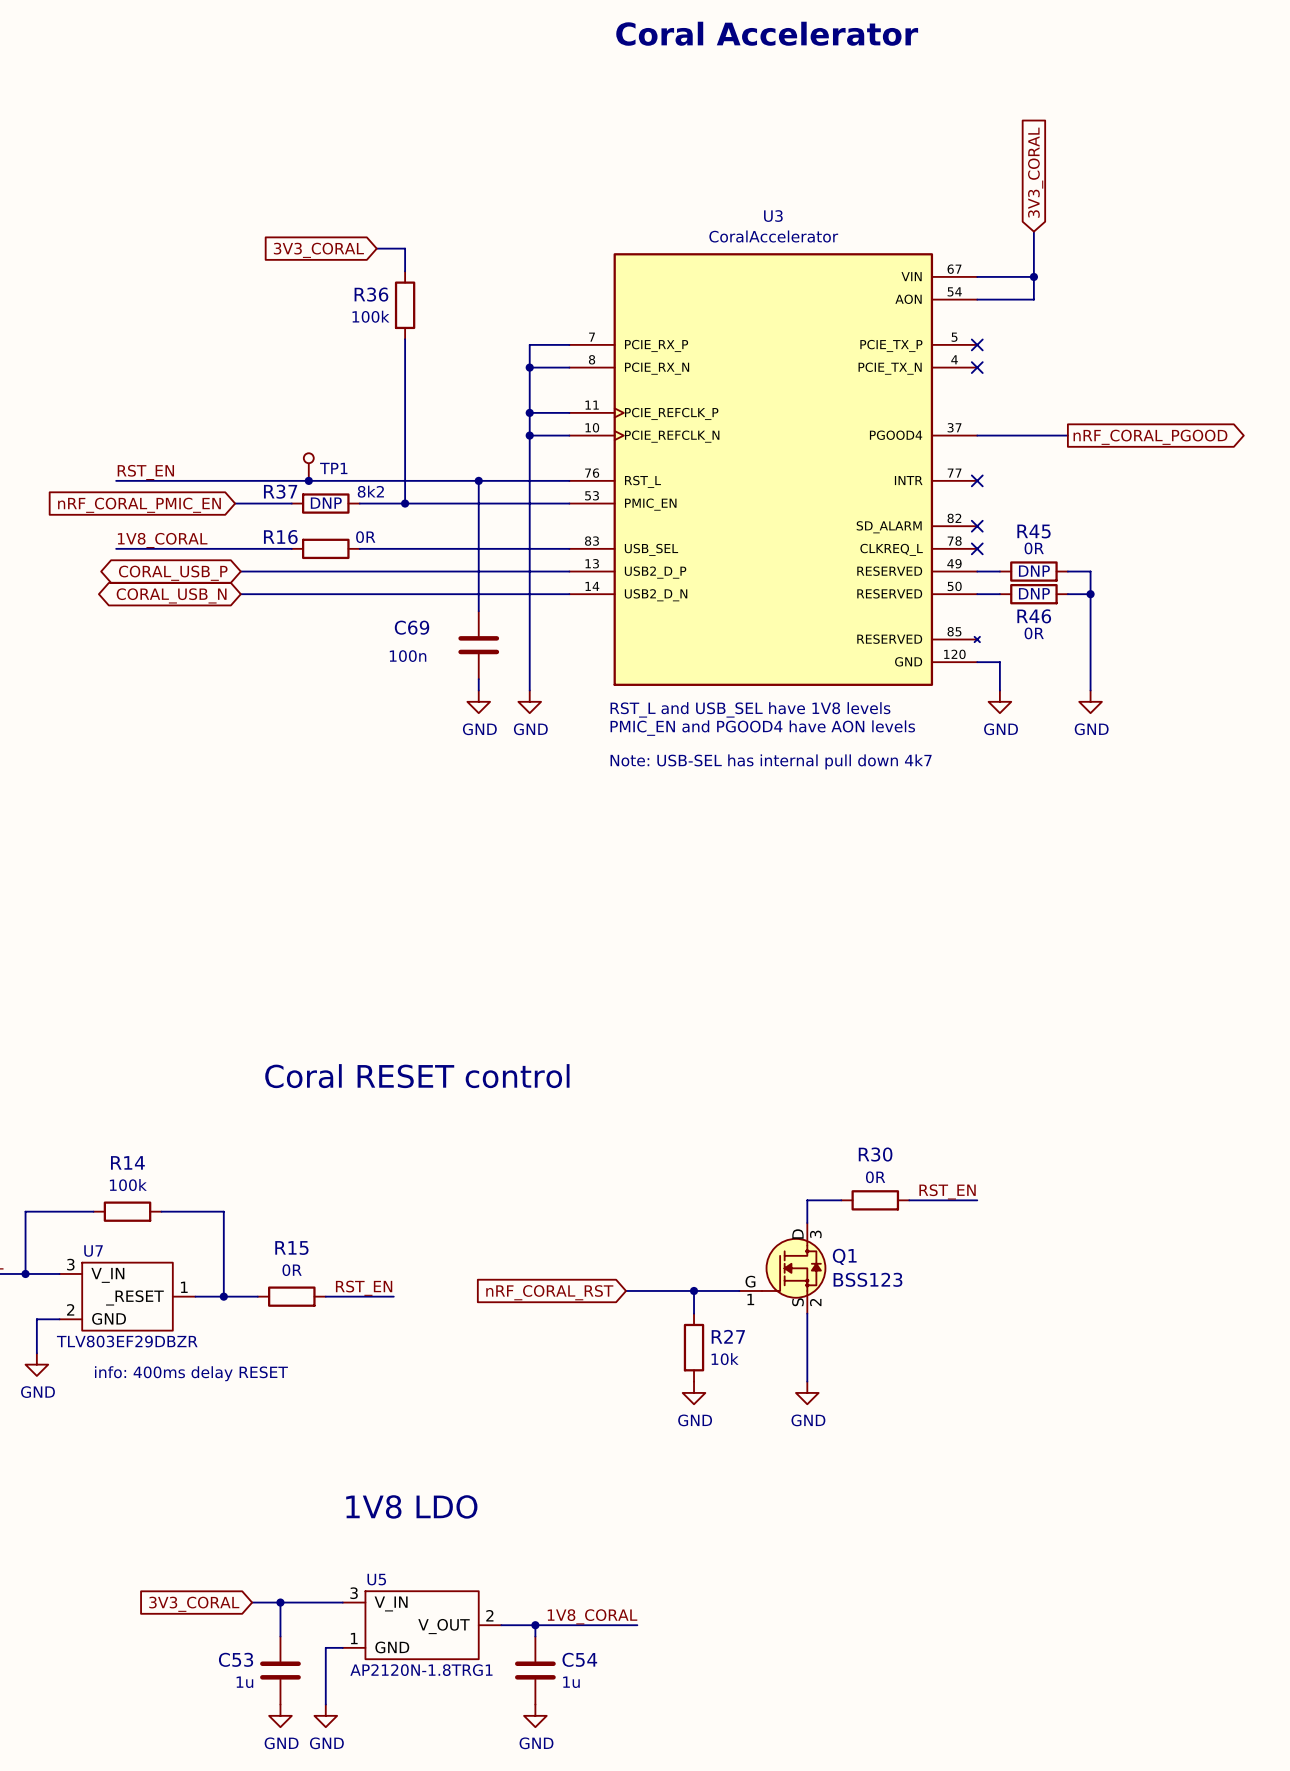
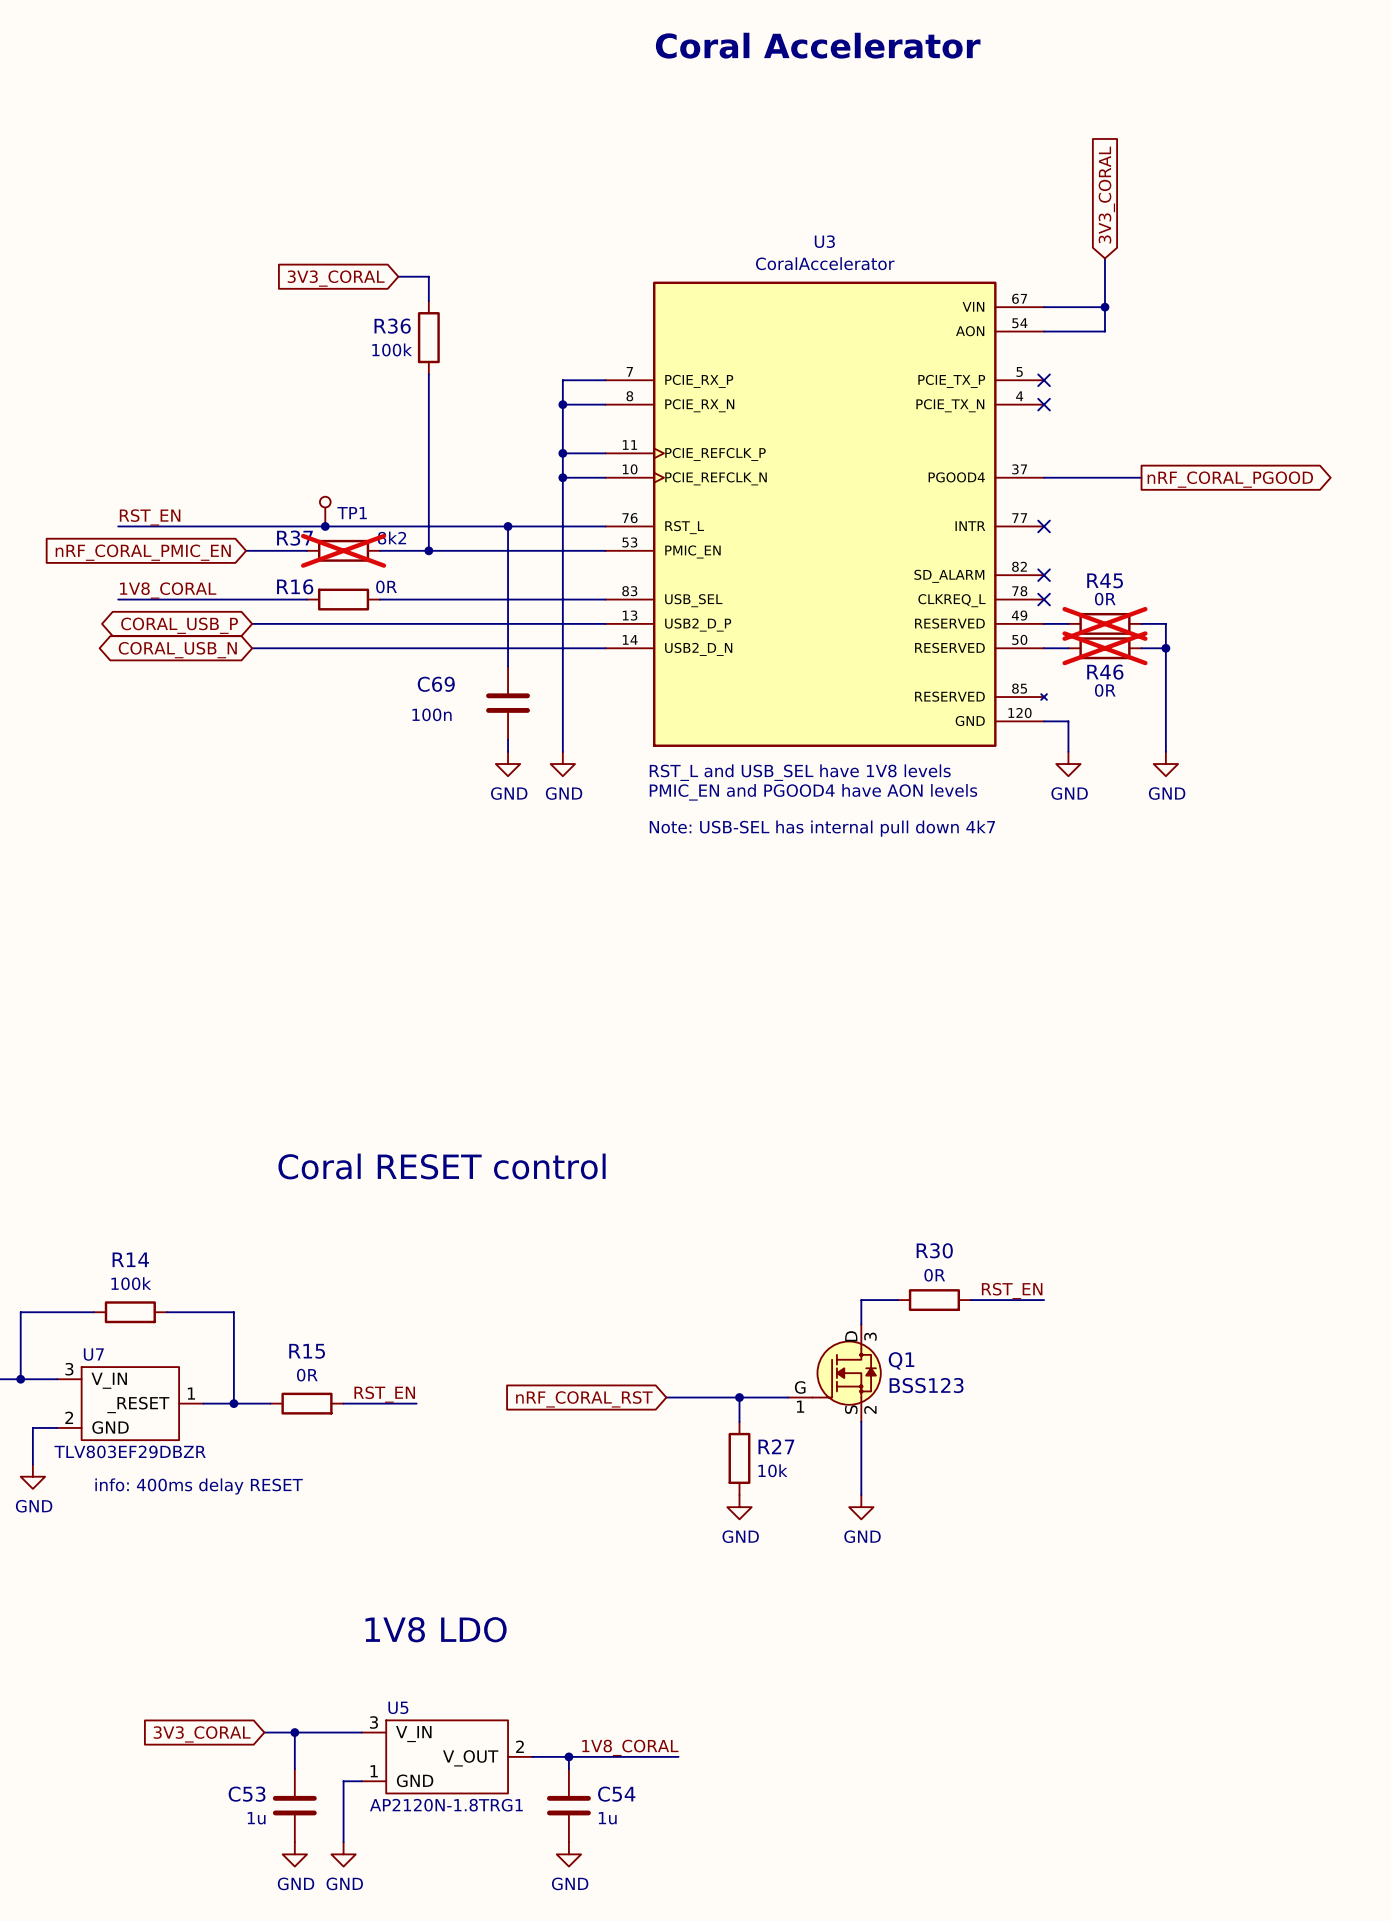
R37 do-not-place cross: none -> (343, 550)
R37 text: DNP (326, 503) -> none
R45 do-not-place cross: none -> (1104, 623)
R45 text: DNP (1034, 571) -> none
R46 text: DNP (1034, 593) -> none
R46 do-not-place cross: none -> (1104, 648)

